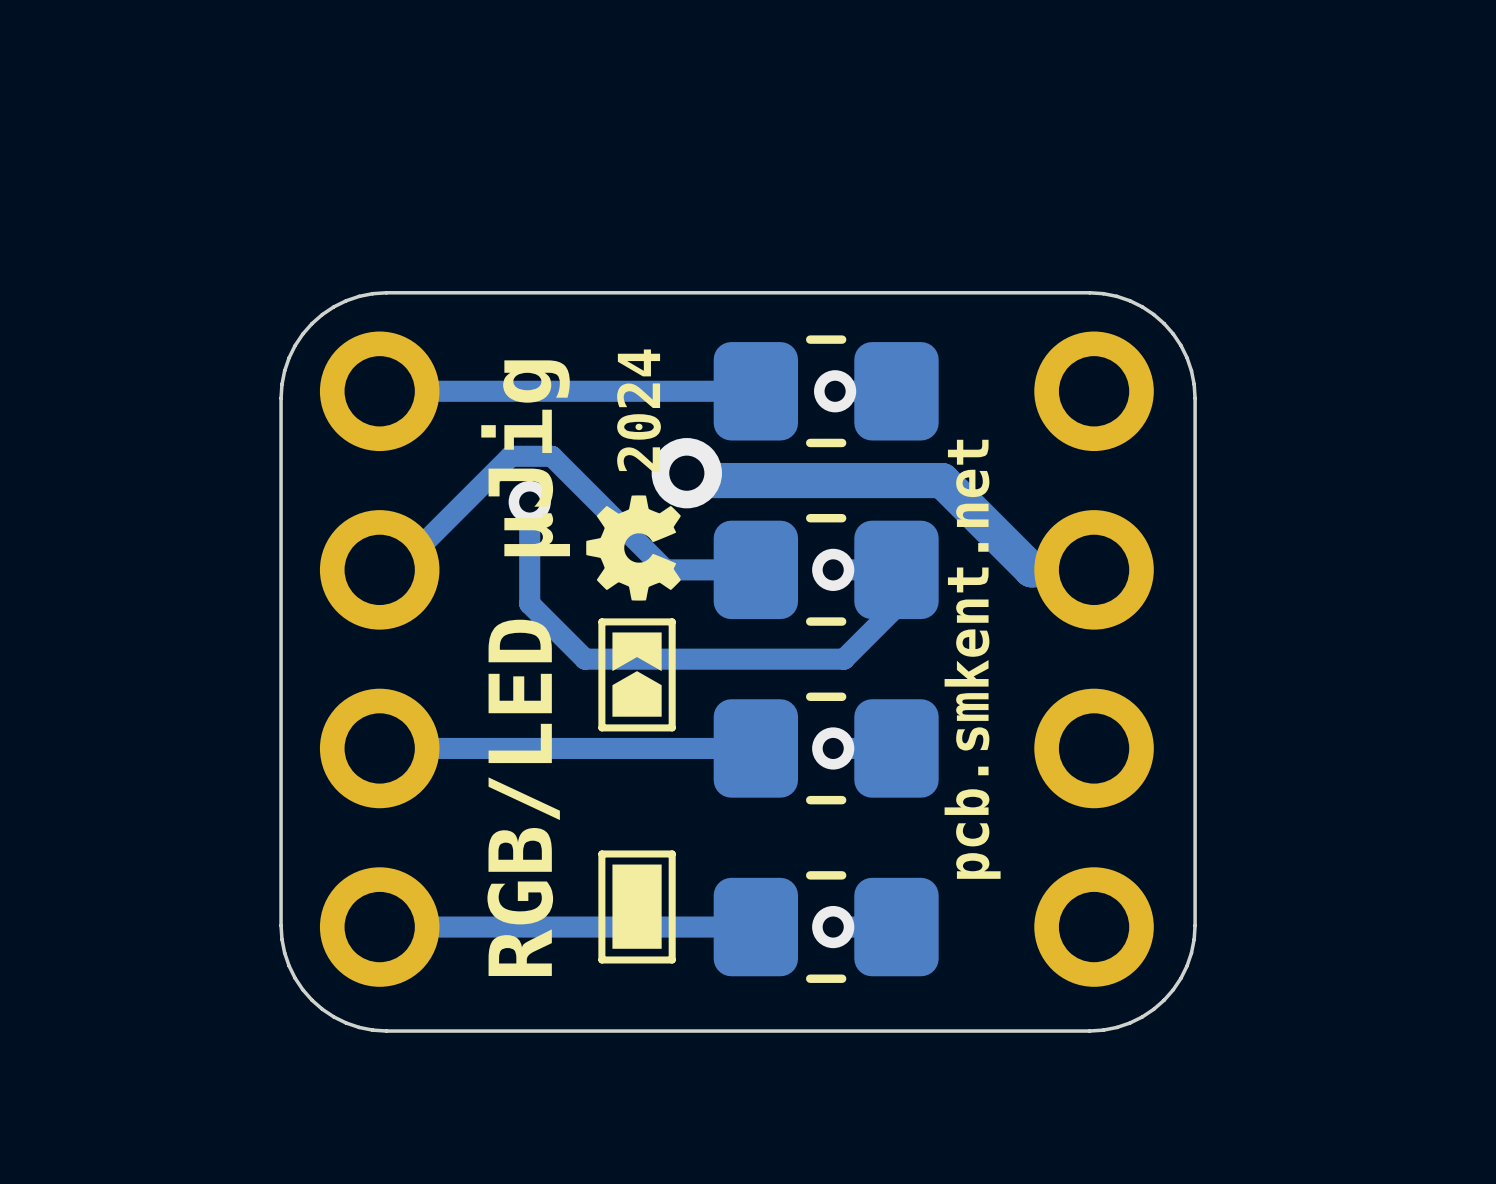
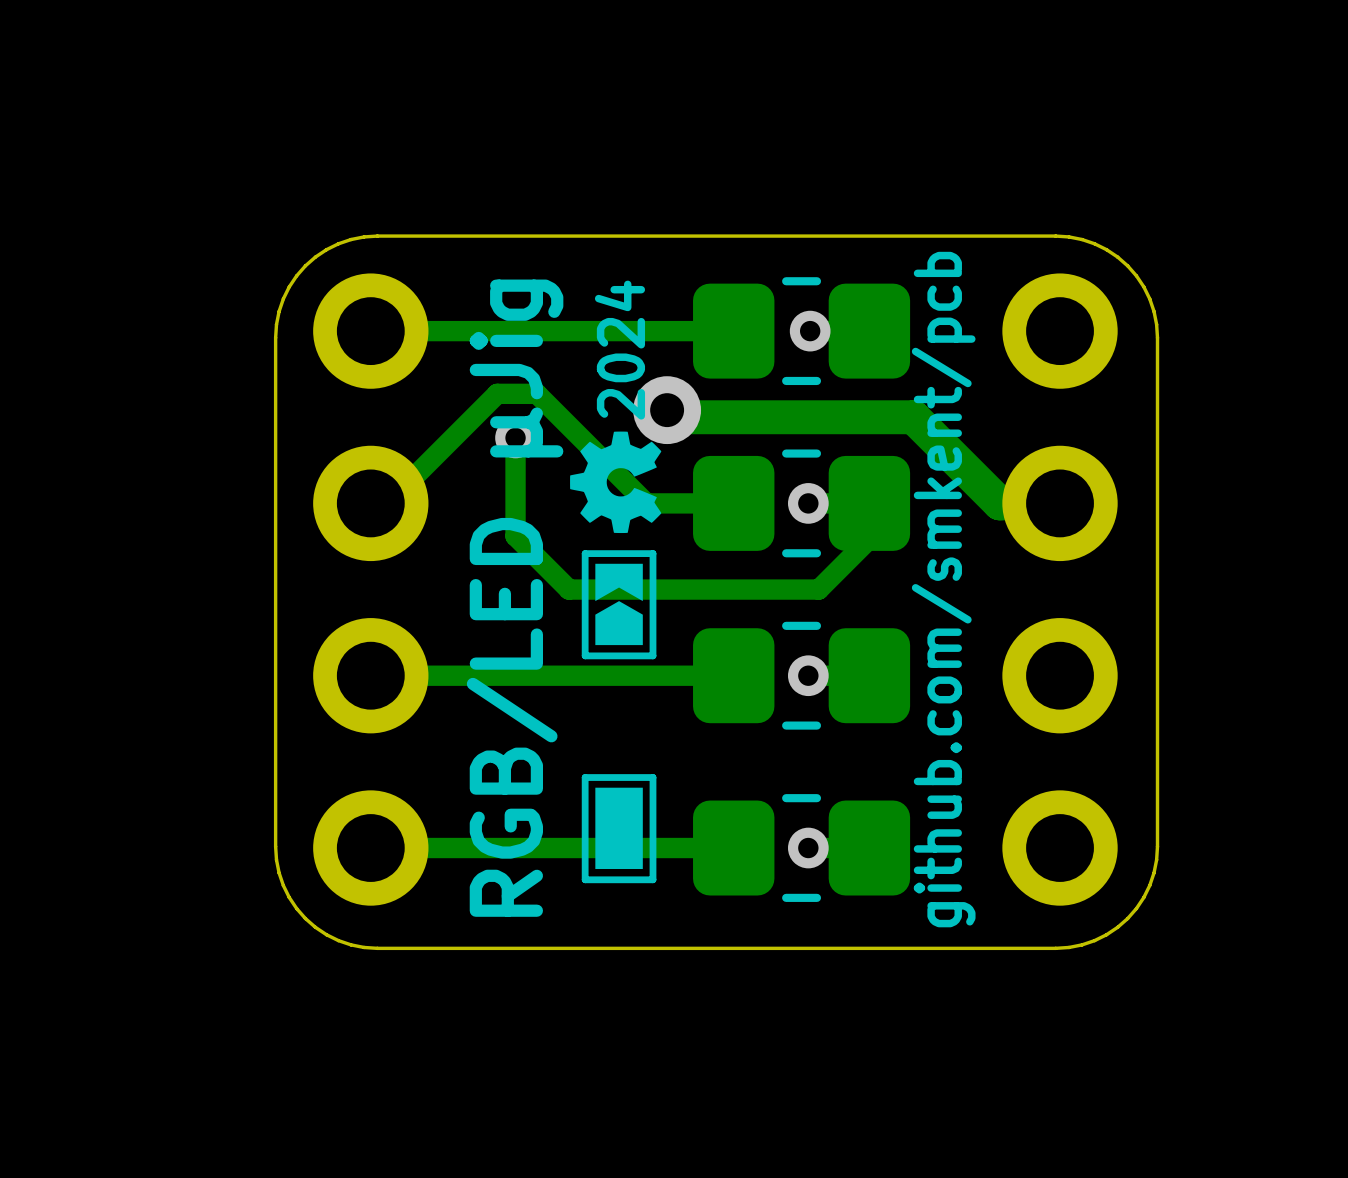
text: pcb.smkent.net (972, 659) -> github.com/smkent/pcb (943, 589)

